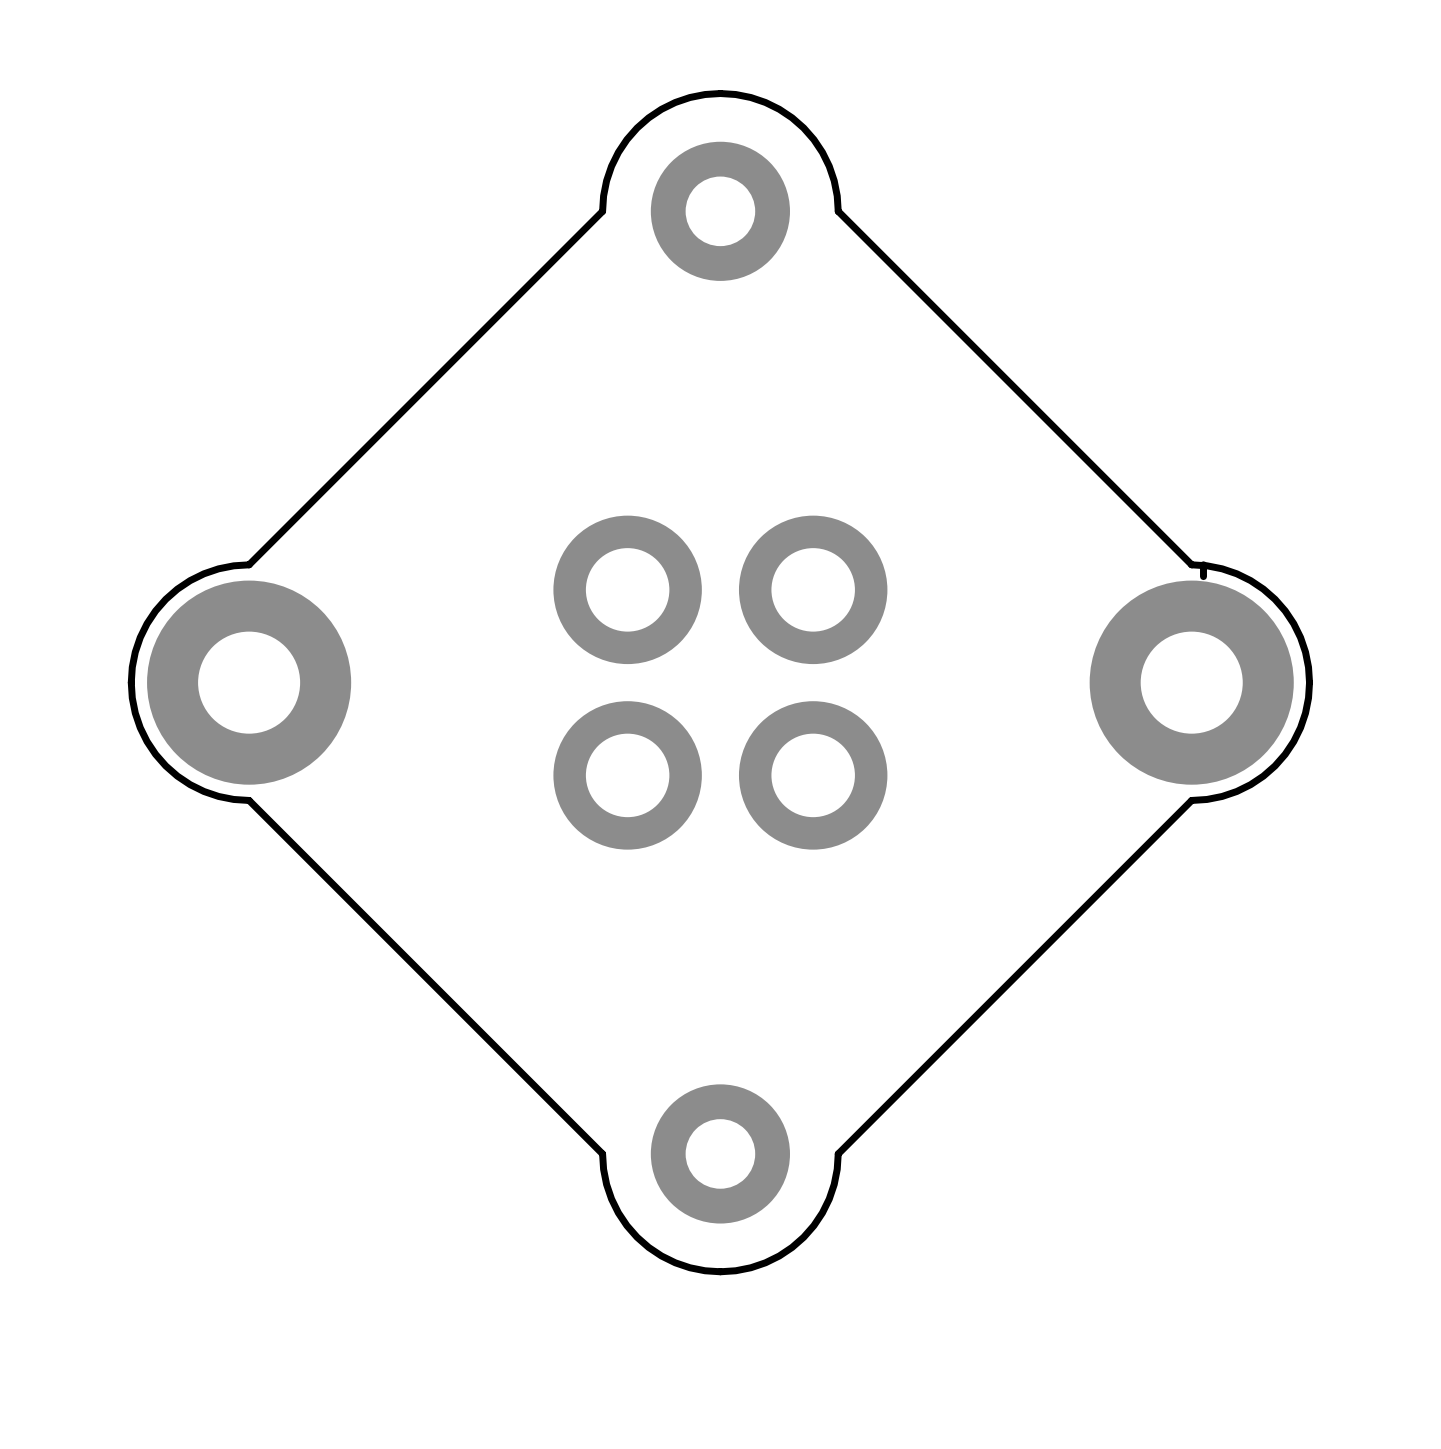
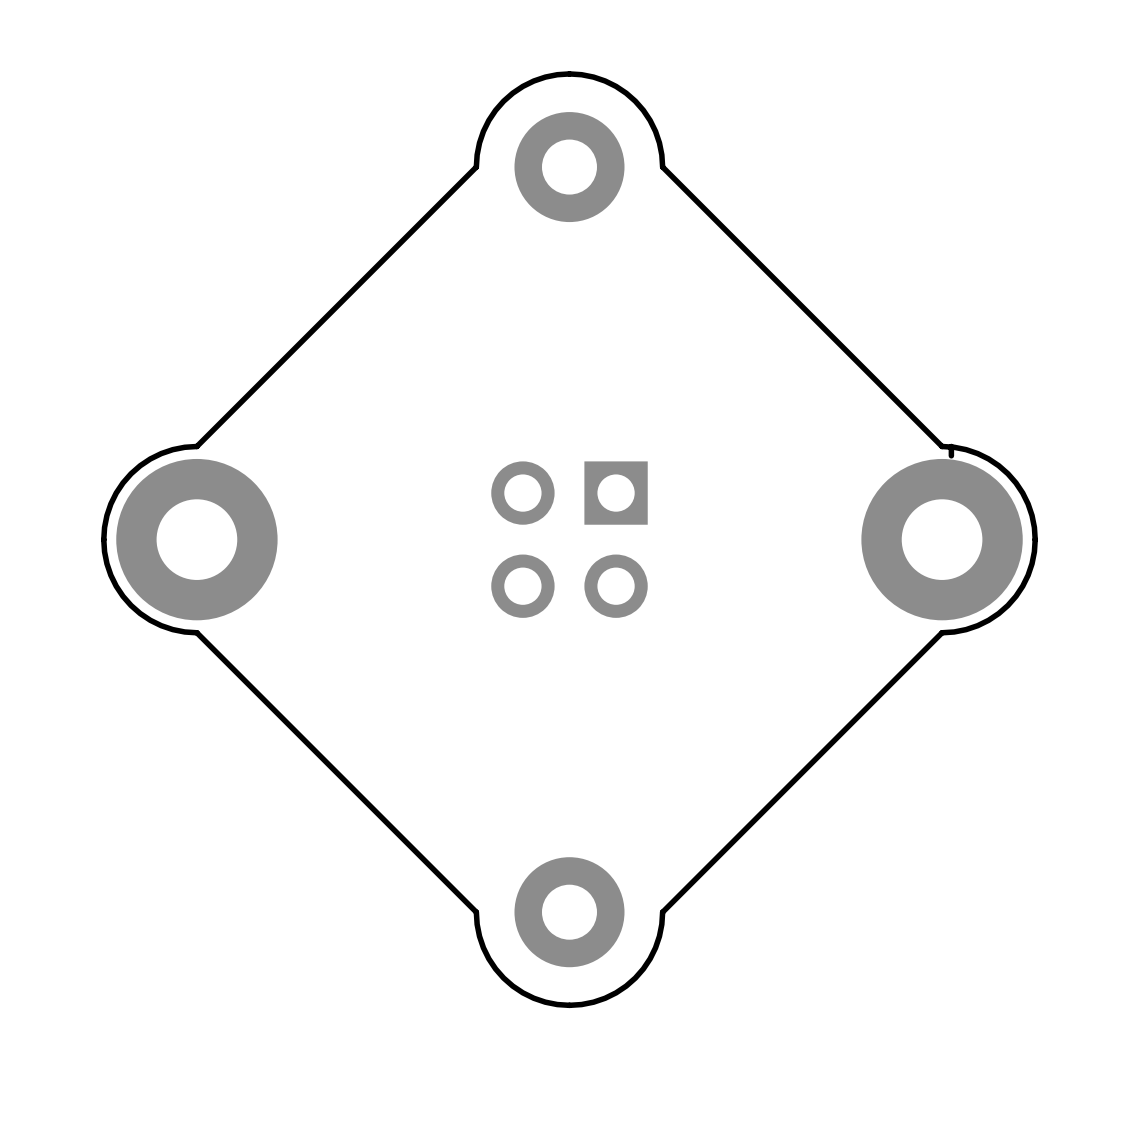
part footprint: [553, 515, 888, 850] -> [491, 461, 648, 618]

